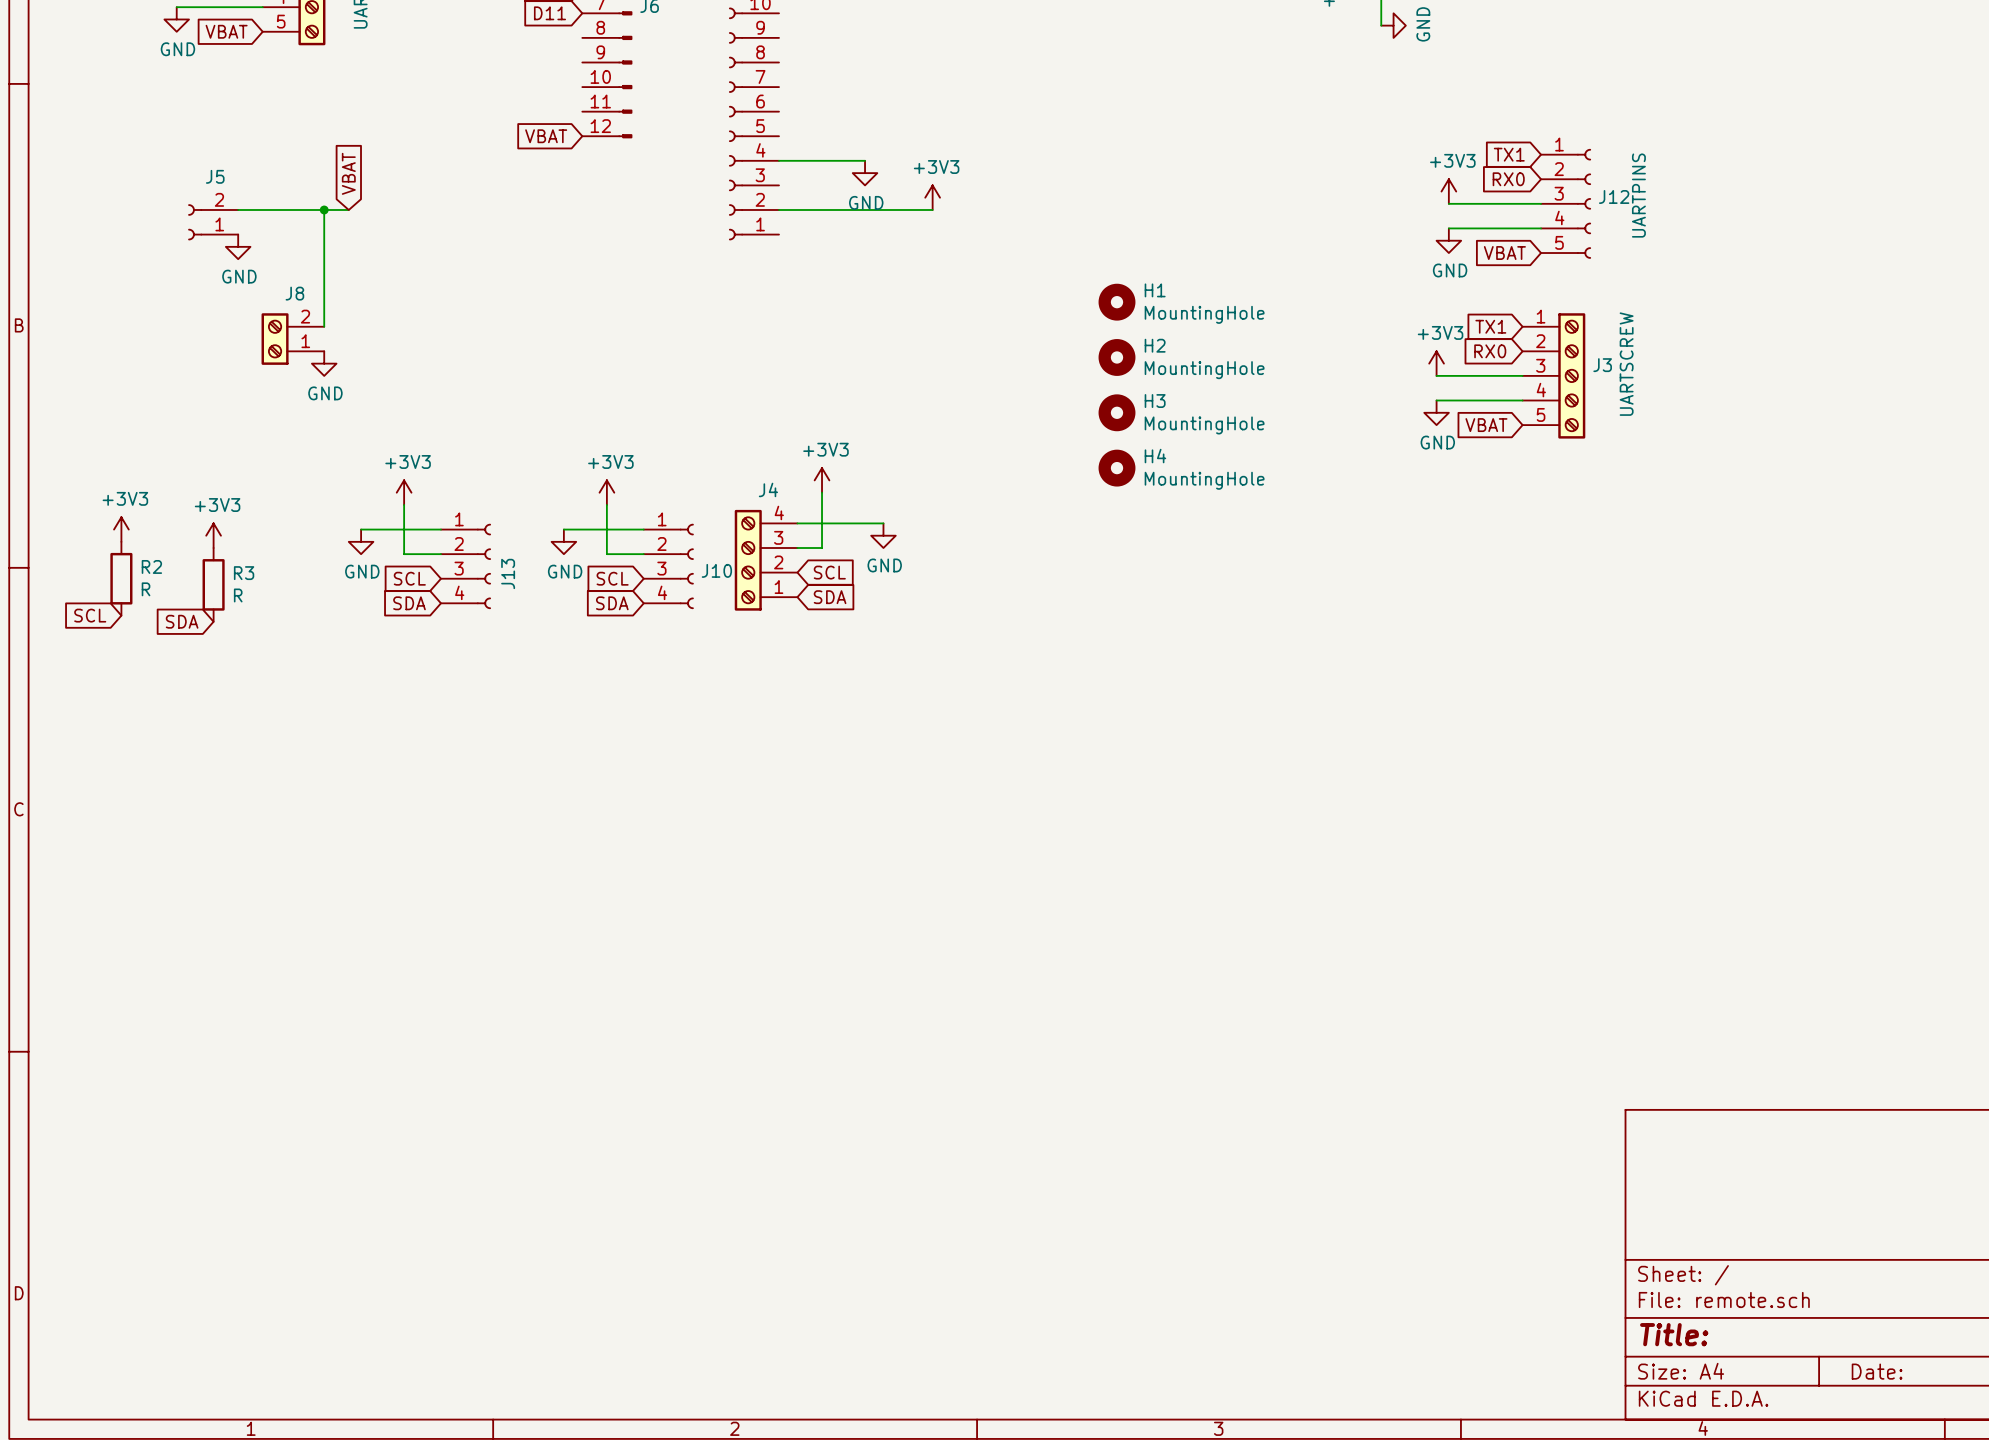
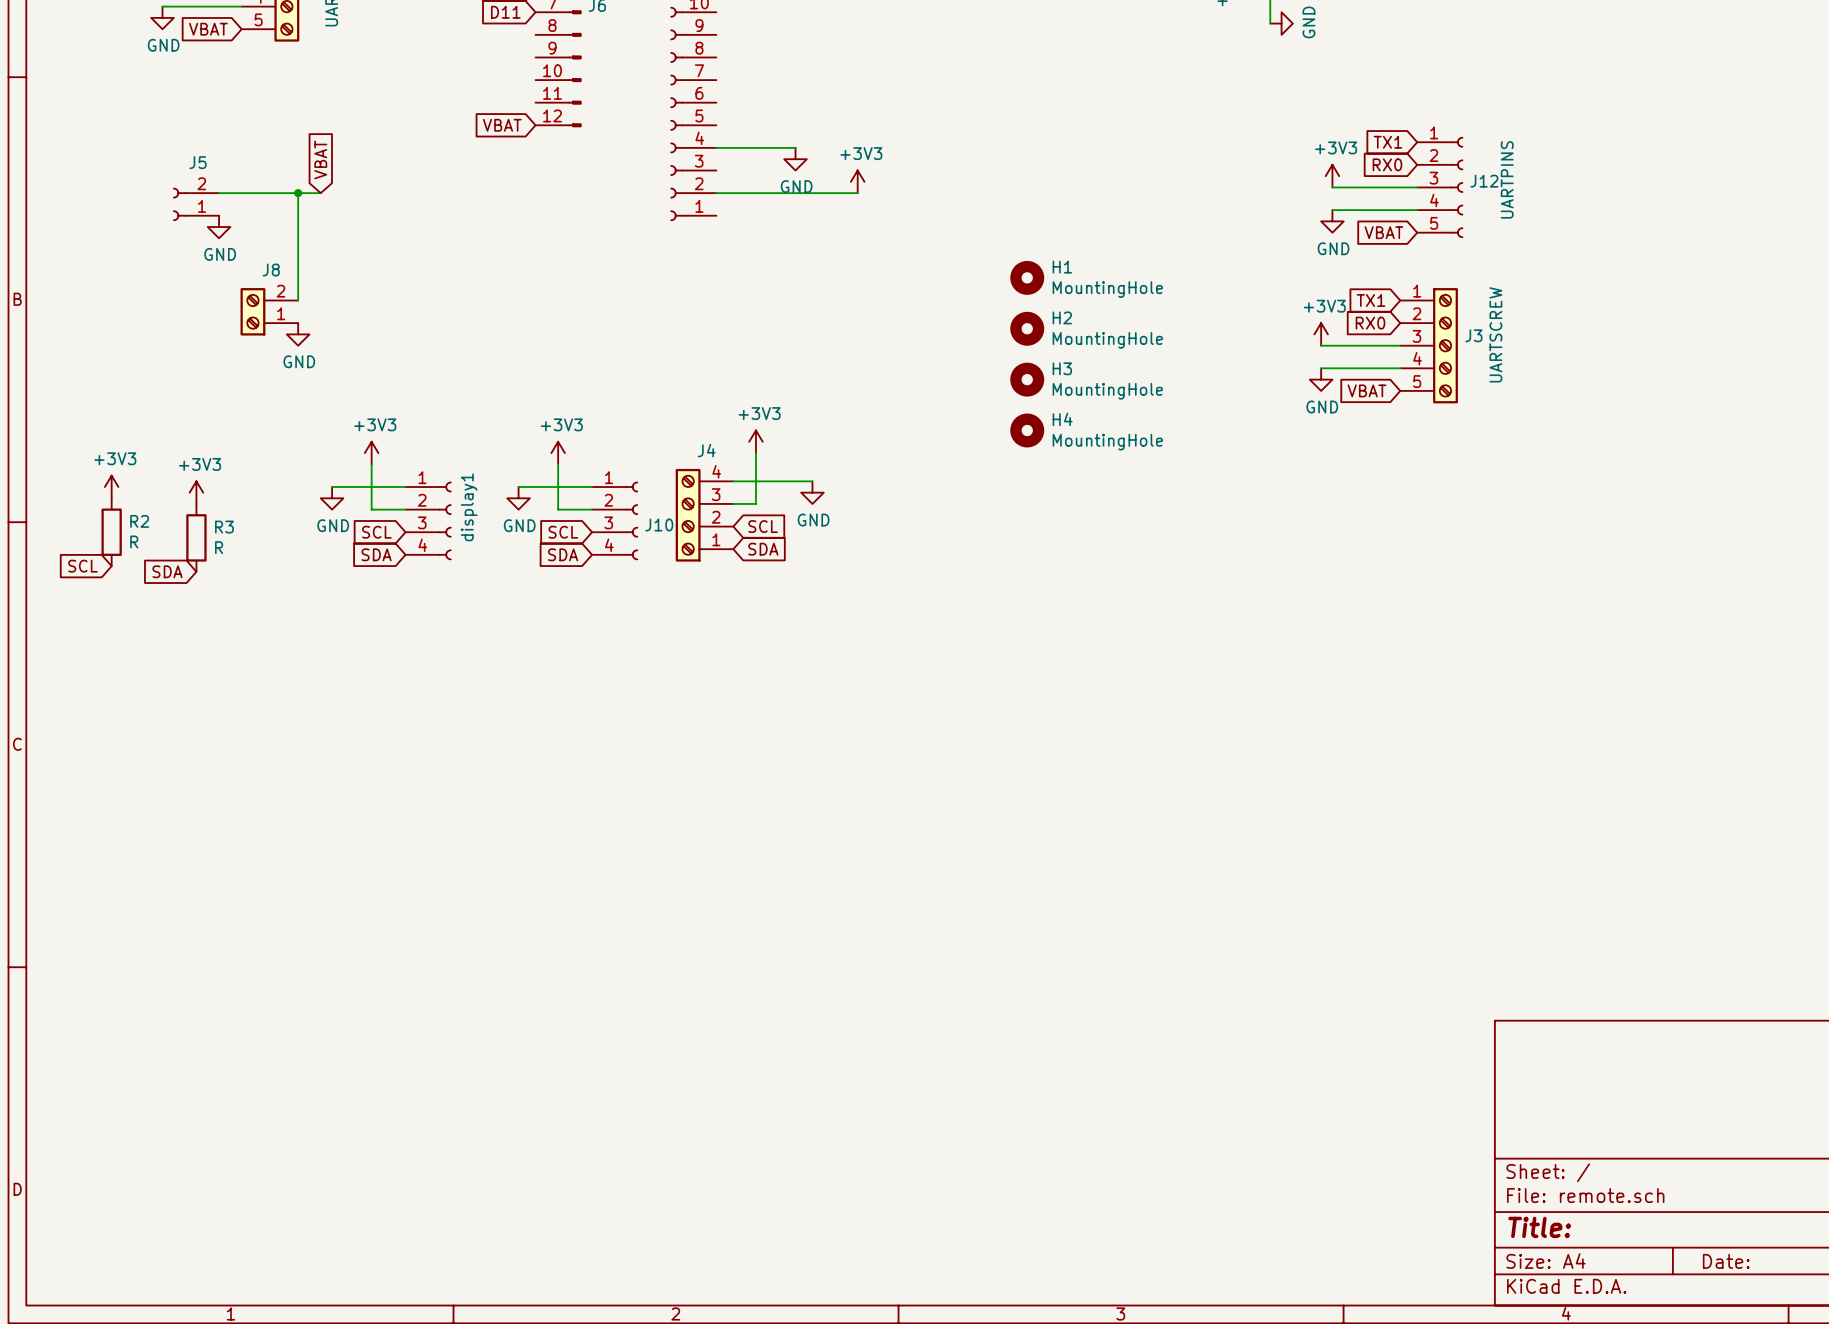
J13 name: J13 (508, 573) -> display1 (469, 507)

